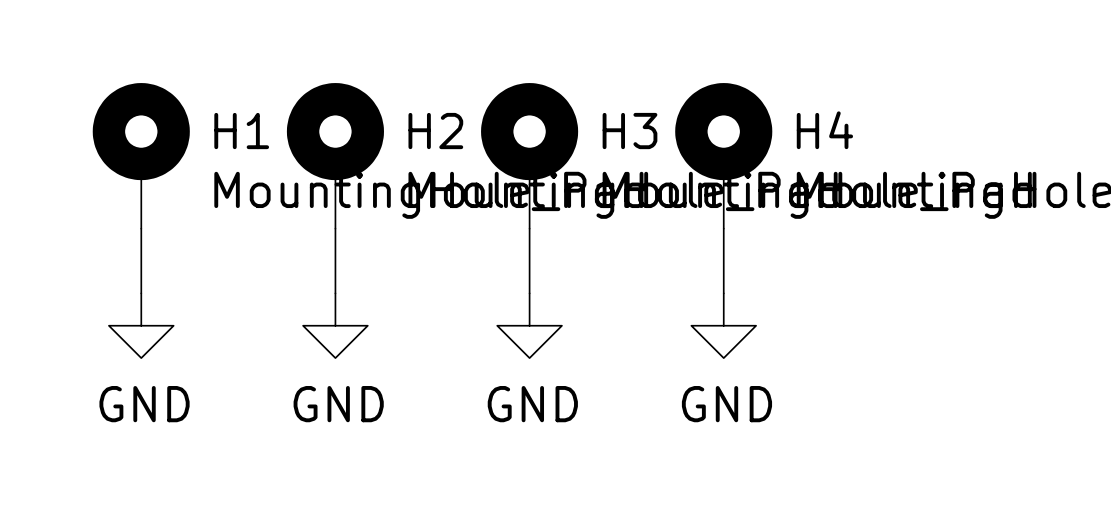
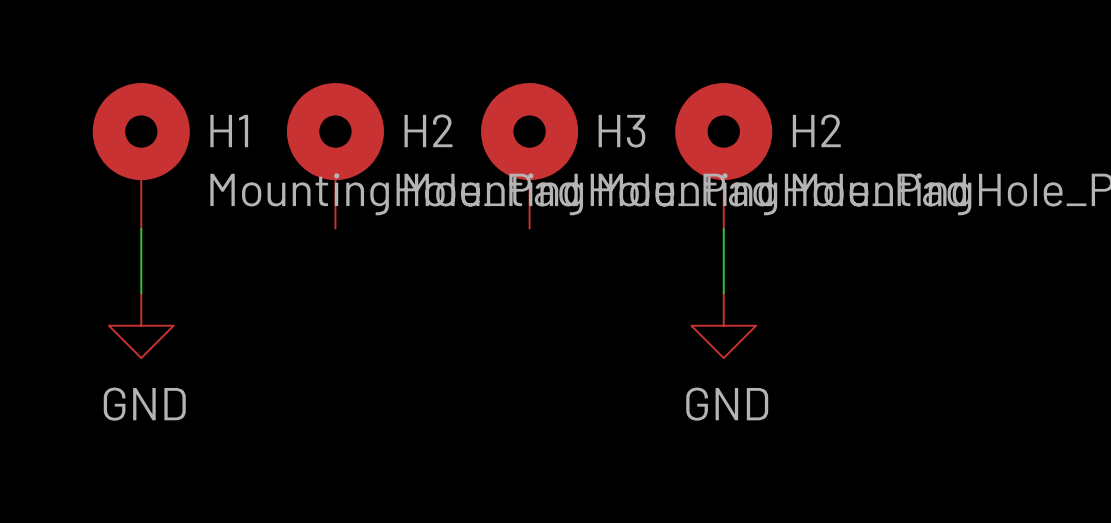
H4 name: H4 (824, 130) -> H2 (816, 130)
wire: (335, 228) (335, 293) -> none
wire: (529, 228) (529, 293) -> none
power symbol: GND (335, 325) -> none
power symbol: GND (529, 325) -> none

